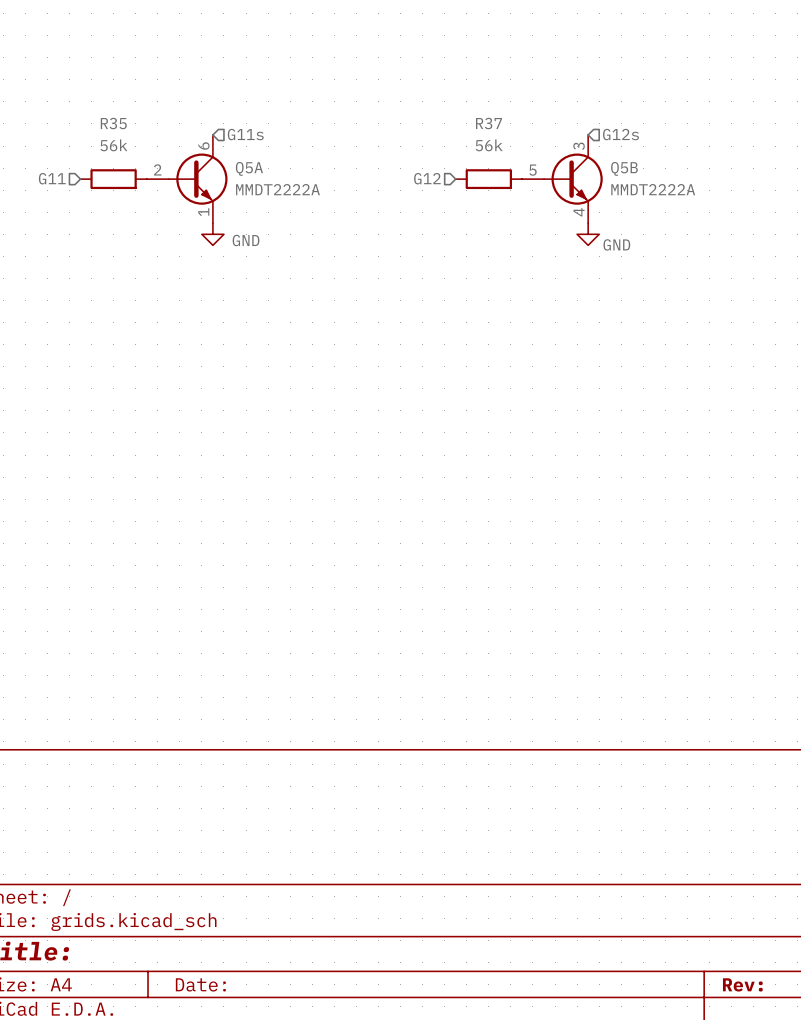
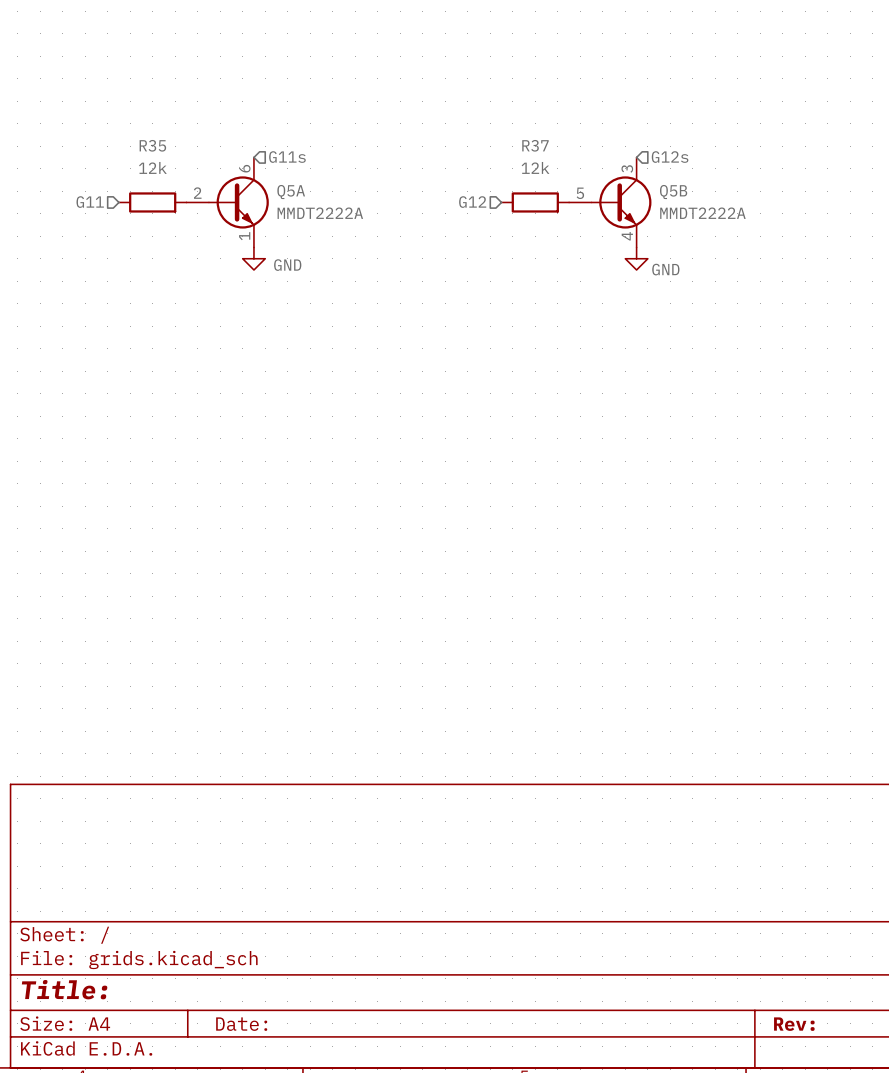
R35 value: 56k (113, 145) -> 12k (152, 167)
R37 value: 56k (489, 145) -> 12k (535, 167)

